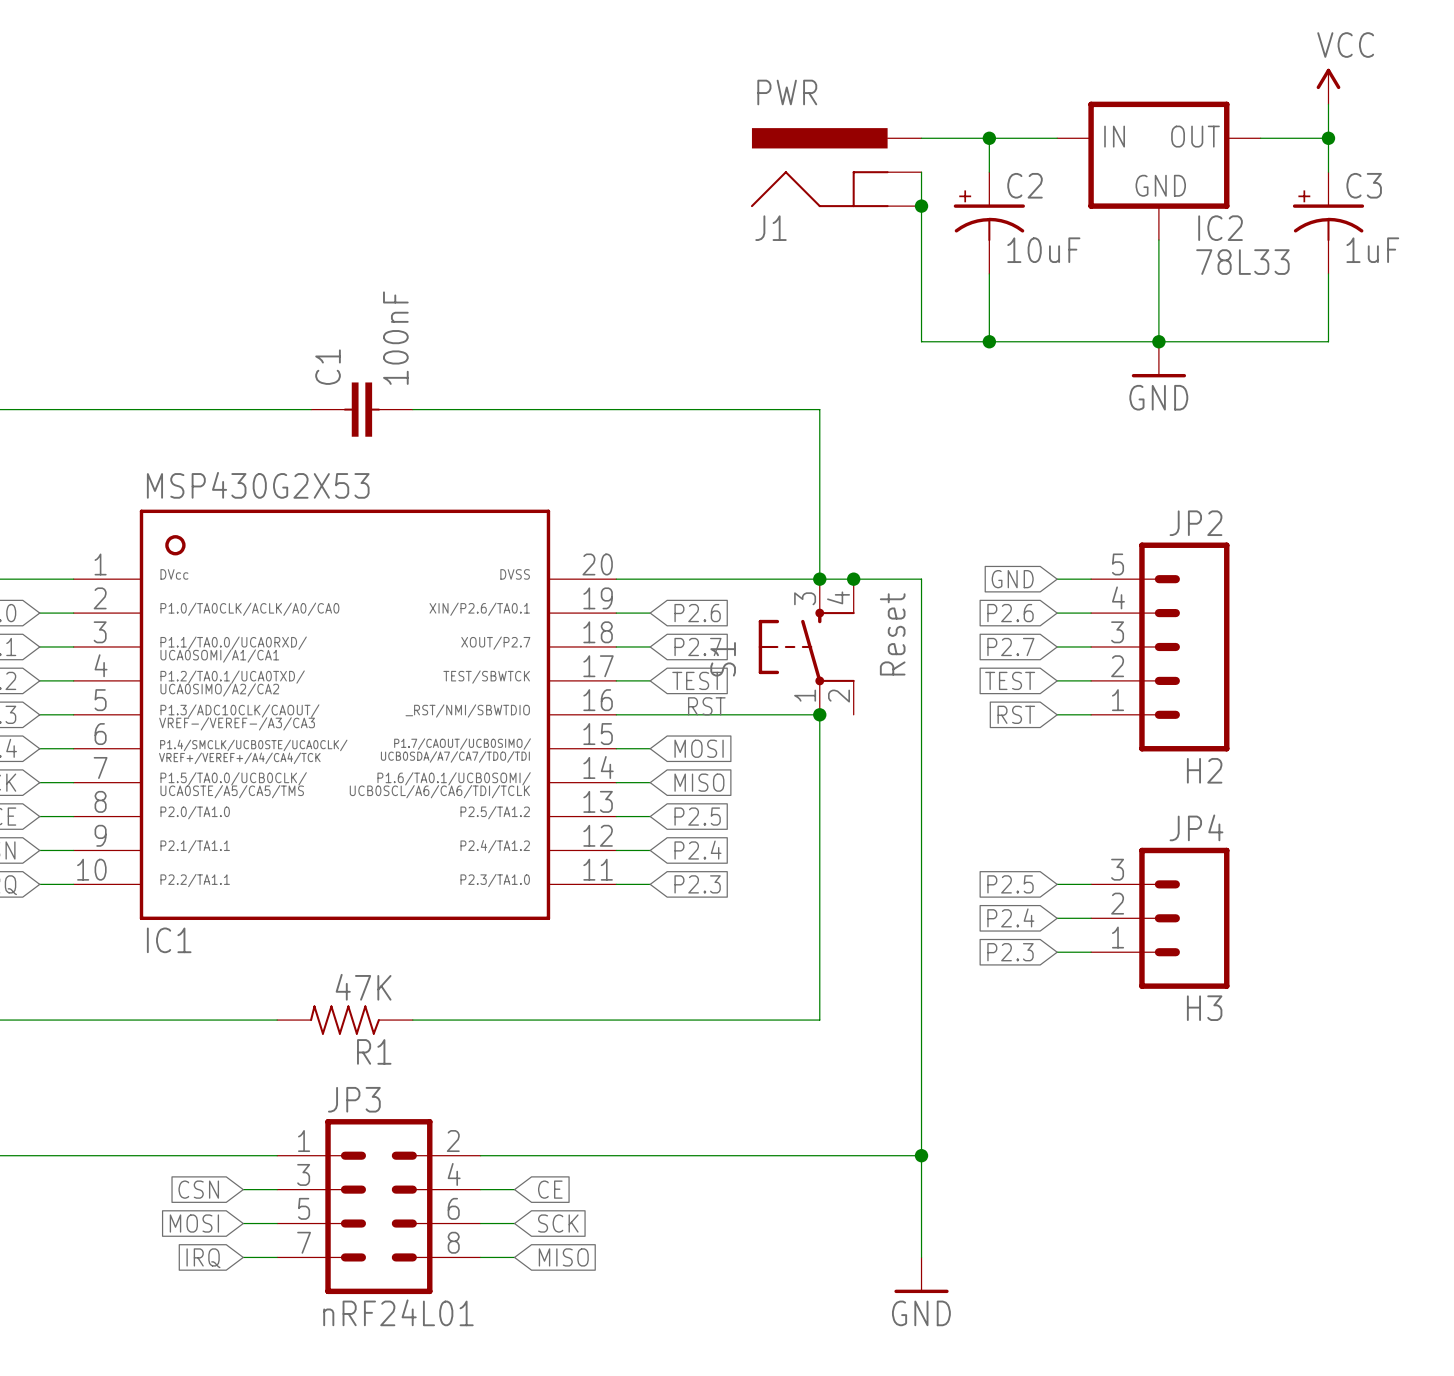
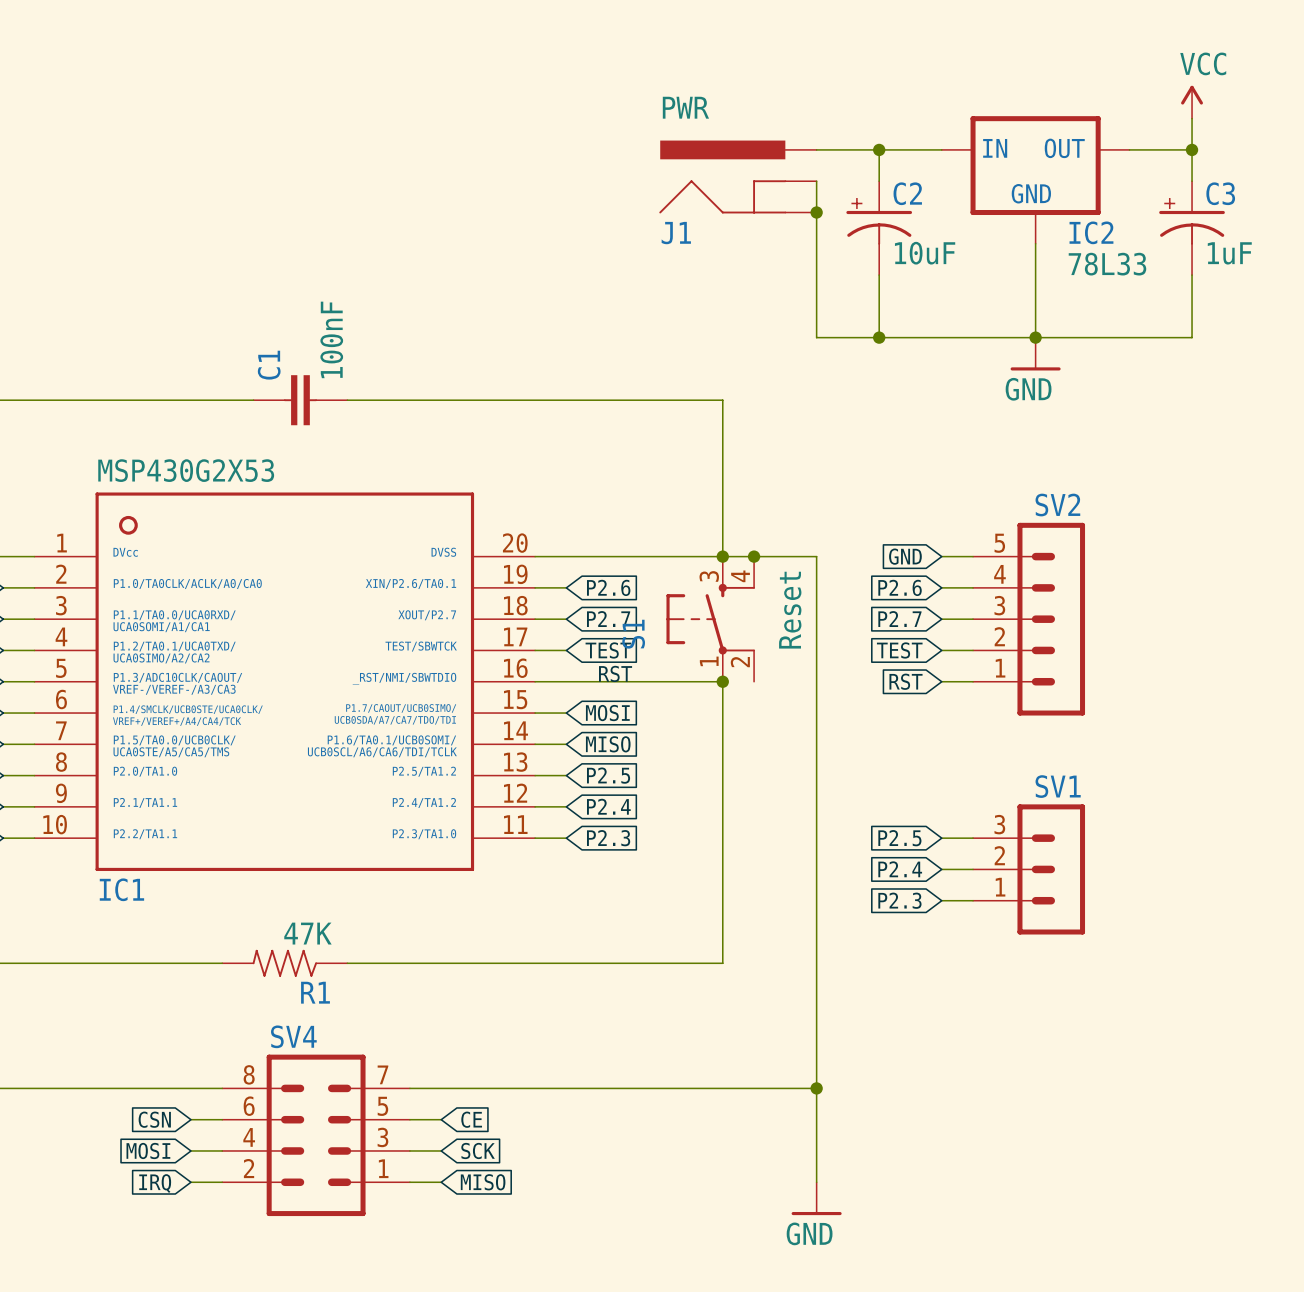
SV2: none -> (1029, 619)
JP2: H2 (1160, 646) -> none
SV1: none -> (1029, 869)
JP4: H3 (1160, 918) -> none
JP3 name: JP3 (354, 1099) -> SV4 (293, 1036)
JP3 rotation: 0° (378, 1206) -> 180° (316, 1135)
JP3 value: nRF24L01 (398, 1312) -> none

